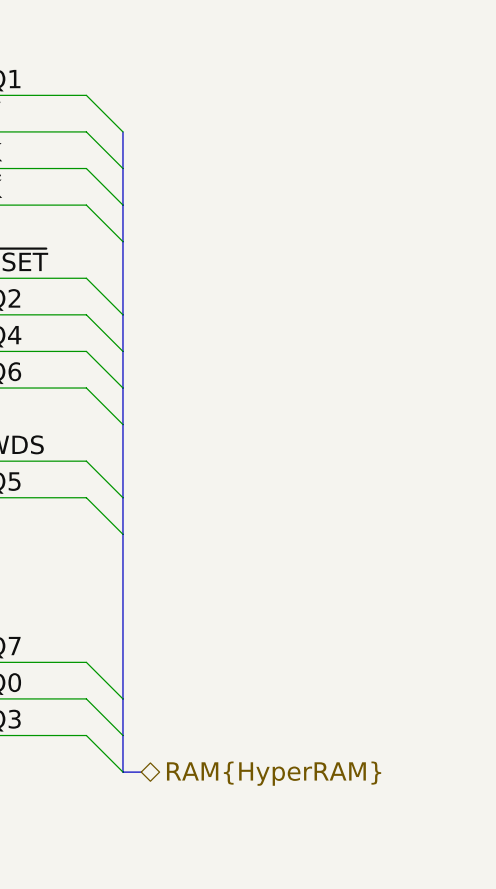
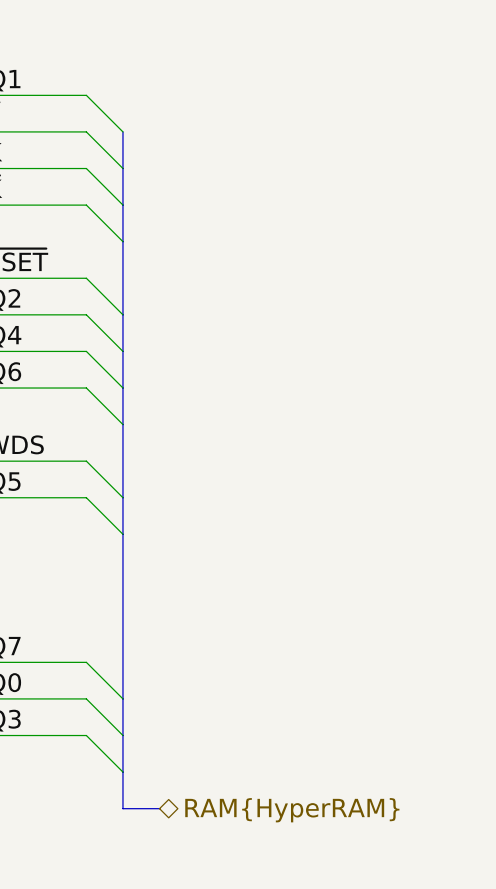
bus: (122, 772) (141, 772) -> (122, 772) (122, 808) (159, 808)
hierarchical label position: RAM{HyperRAM} (274, 773) -> RAM{HyperRAM} (292, 810)

